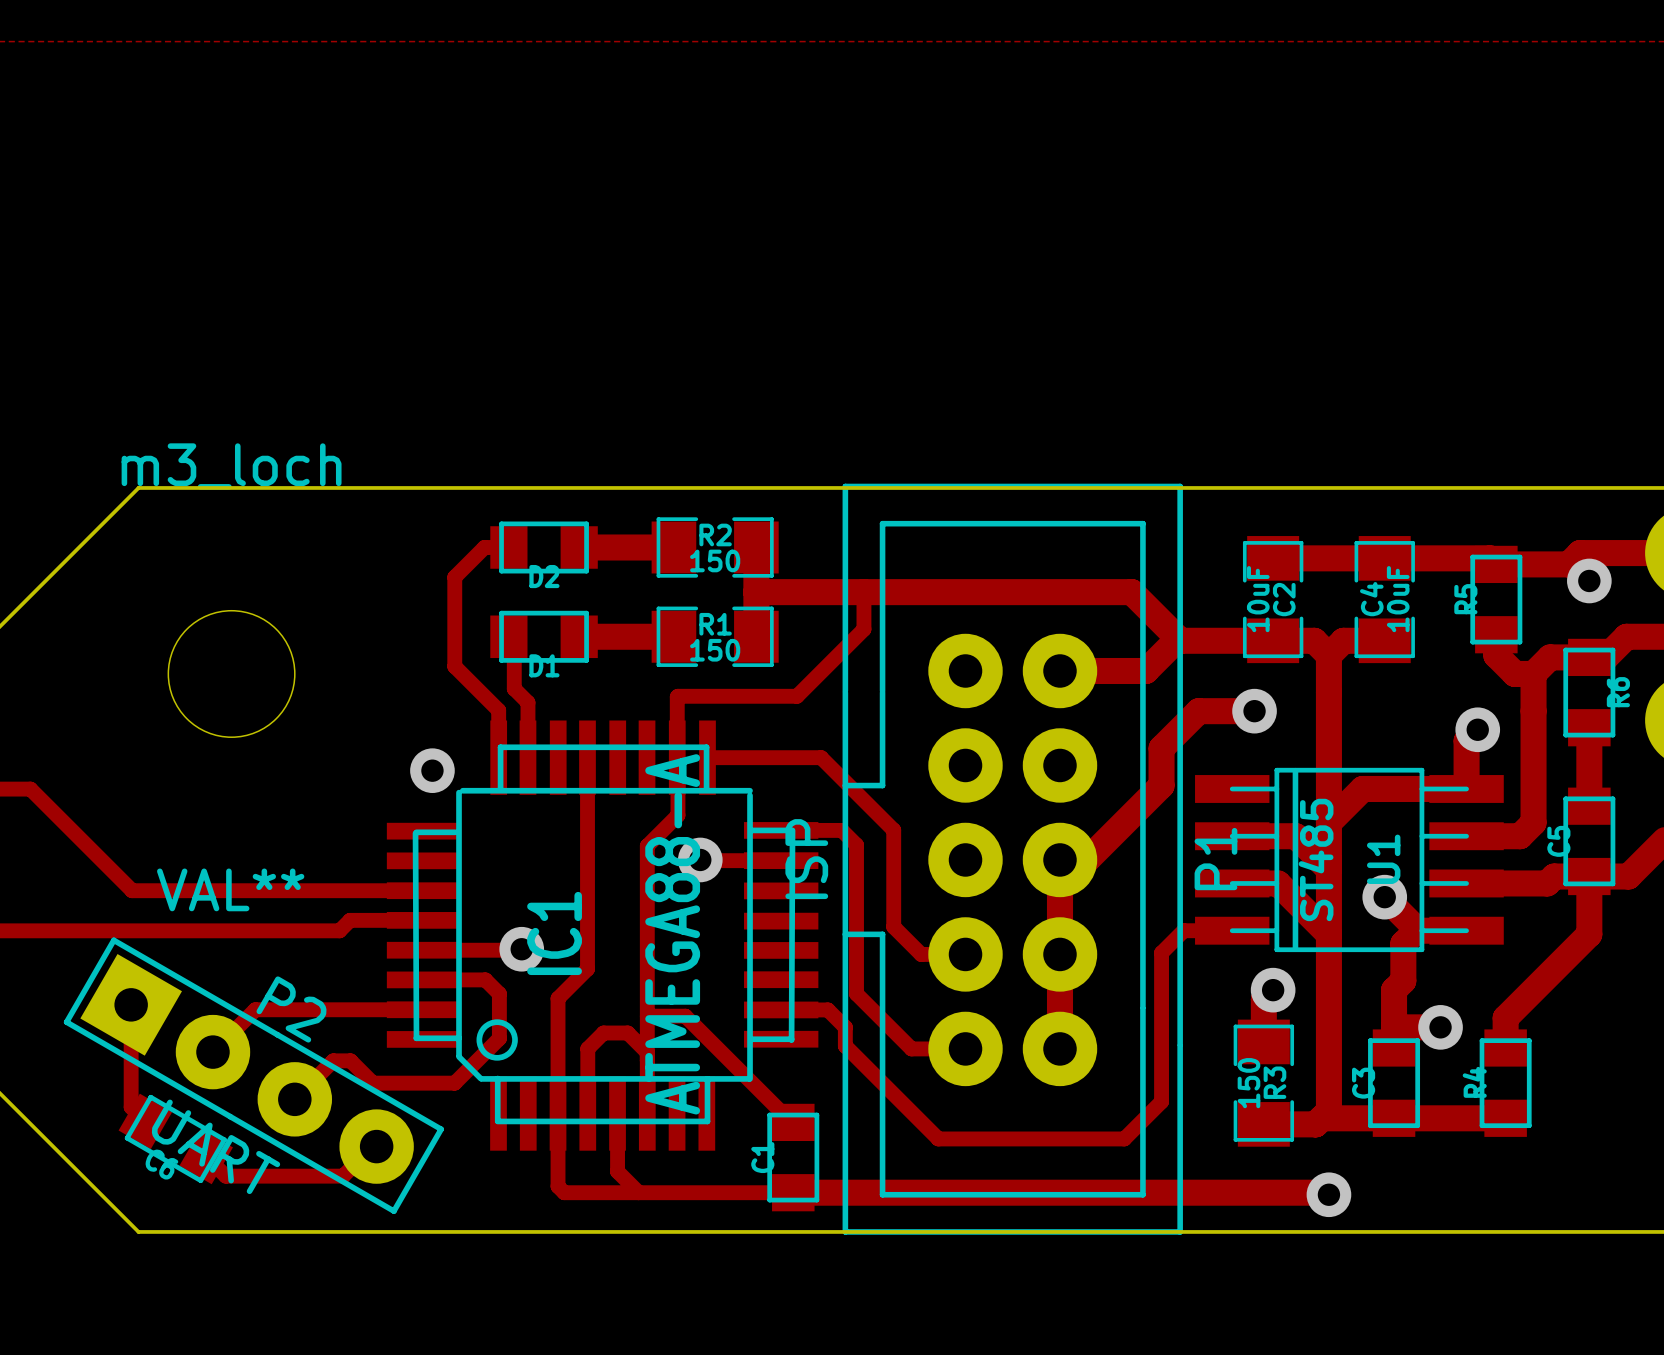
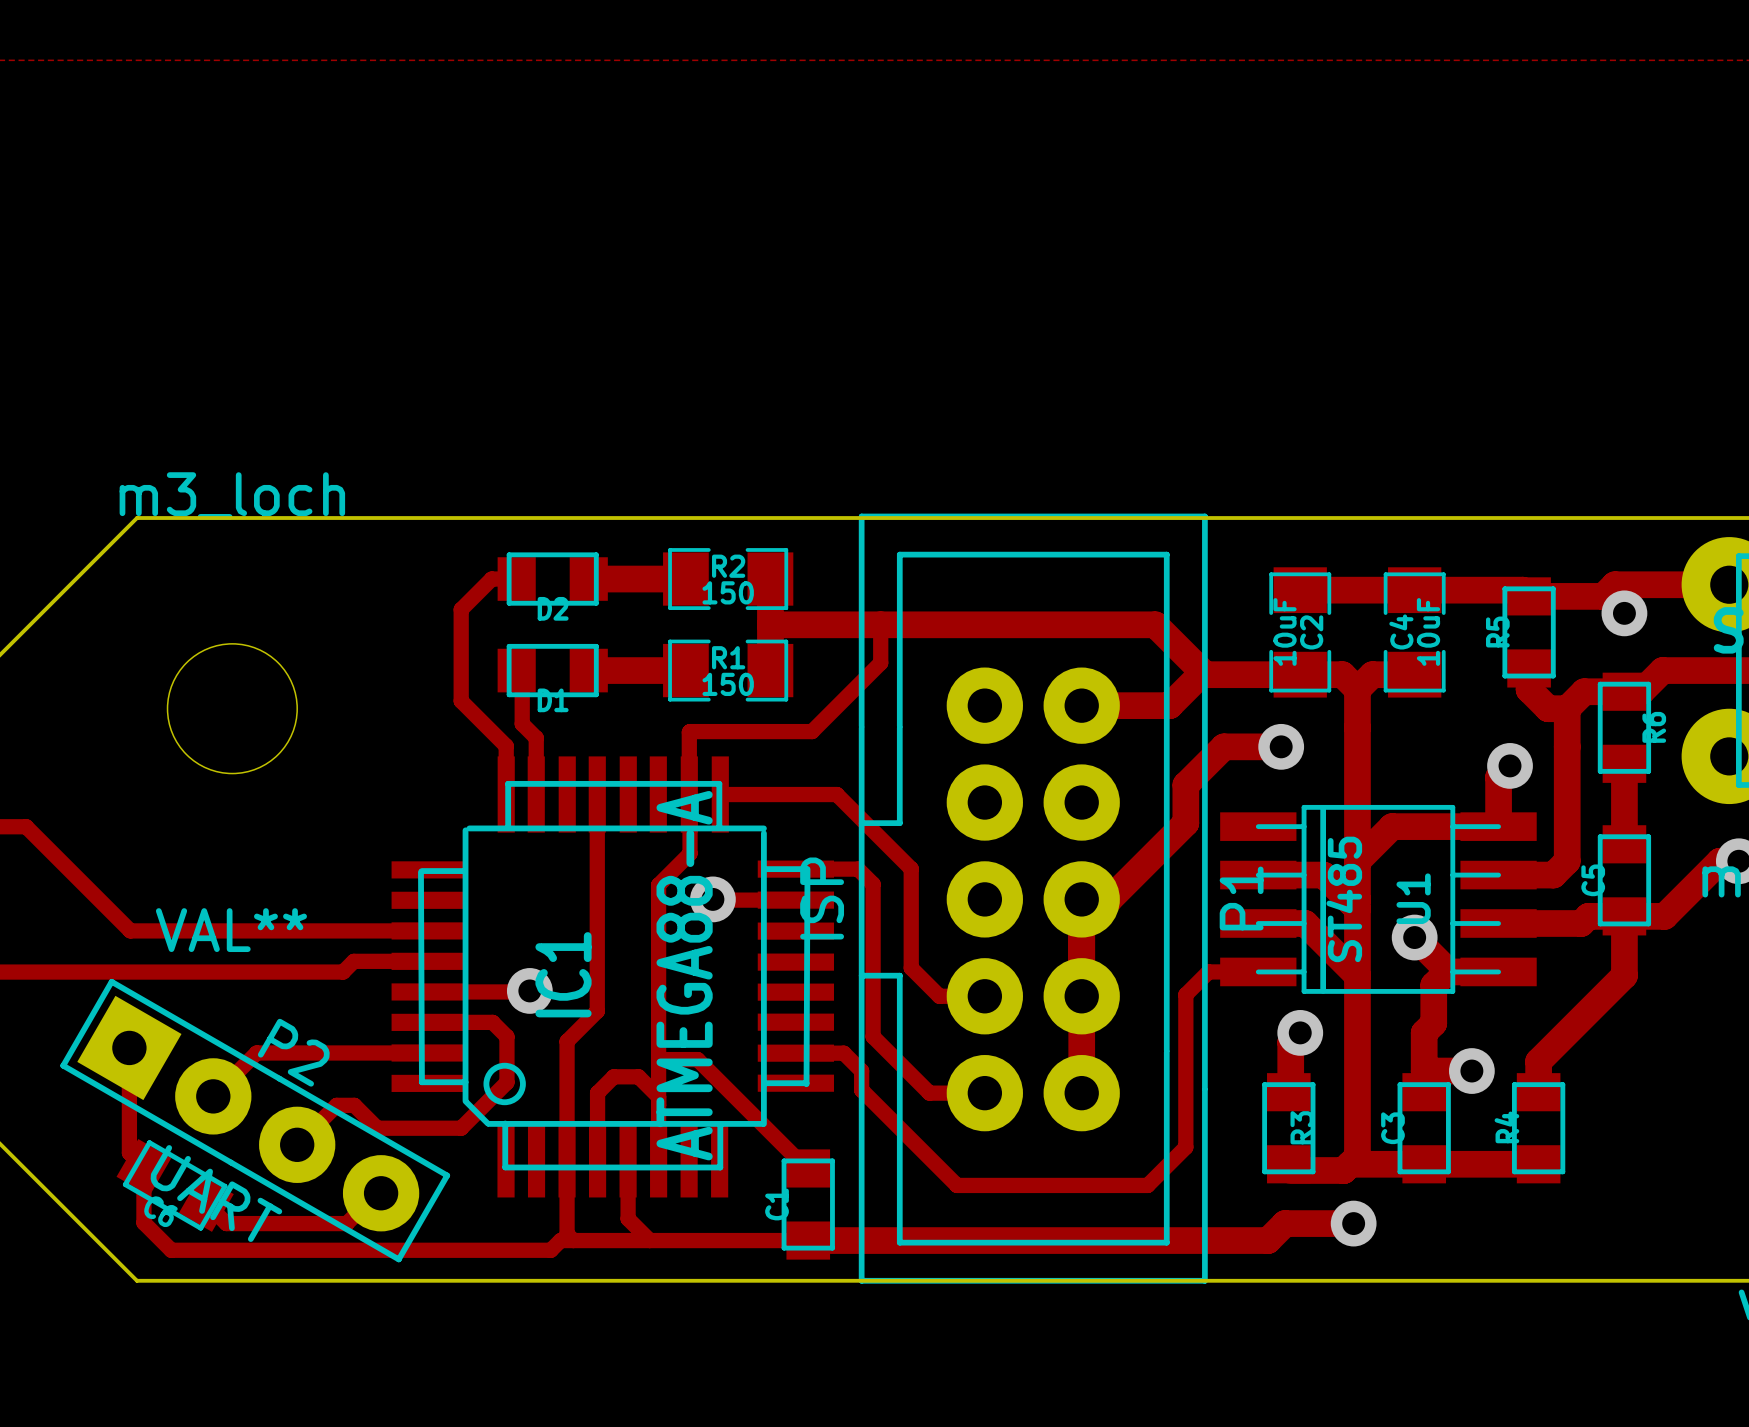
via: (432, 770) -> none
R3 footprint: [1233, 1019, 1295, 1147] -> [1262, 1073, 1316, 1184]
R3 value: 150 (1248, 1083) -> none
track: none -> (143, 1167) (143, 1222) (171, 1250) (550, 1250) (560, 1240) (573, 1240)
track: (1241, 1192) (1326, 1192) (1328, 1194) -> (1268, 1240) (1285, 1223) (1353, 1223)
via position: (1328, 1194) -> (1353, 1223)

